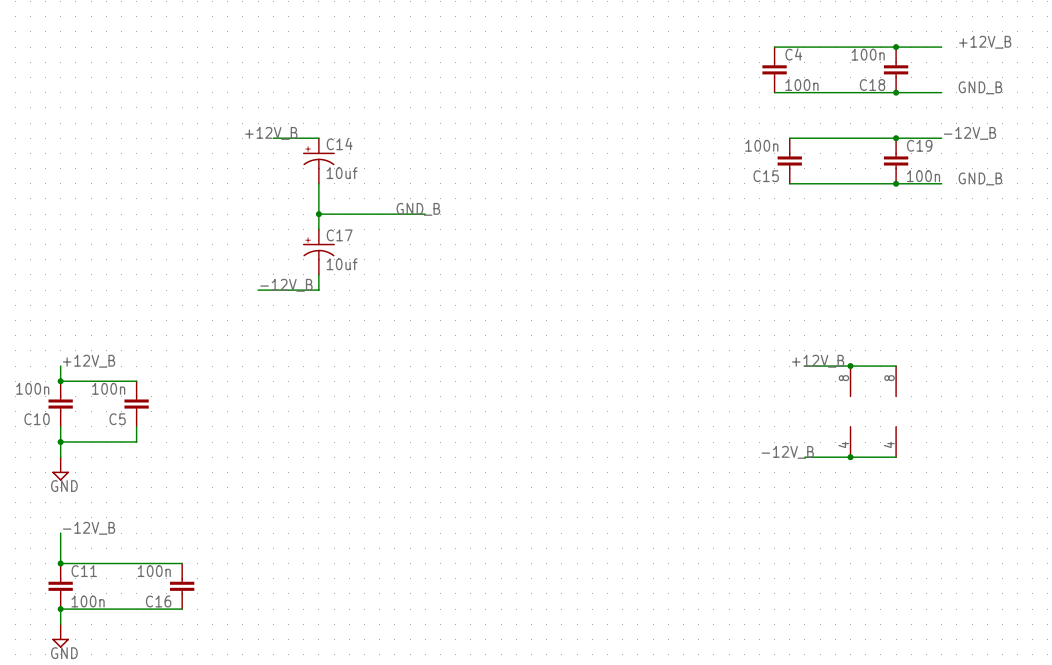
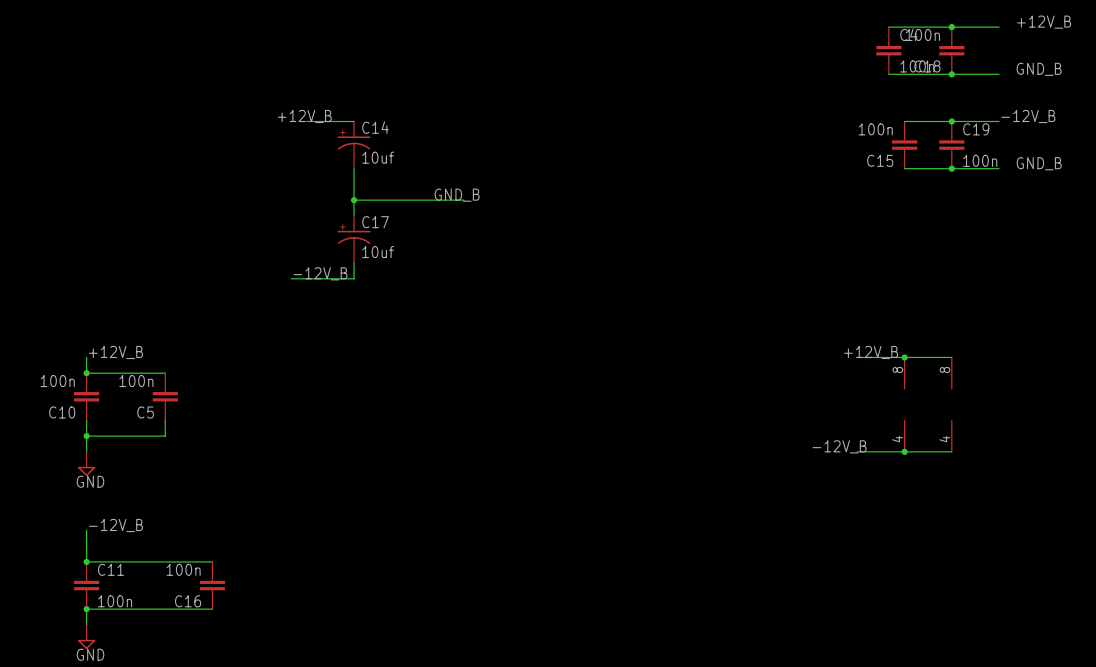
wire: (774, 47) (835, 47) -> none
C4 position: (774, 69) -> (888, 50)
wire: (774, 92) (835, 92) -> none
wire: (789, 138) (850, 138) -> none
C15 position: (789, 160) -> (904, 145)
wire: (789, 183) (850, 183) -> none

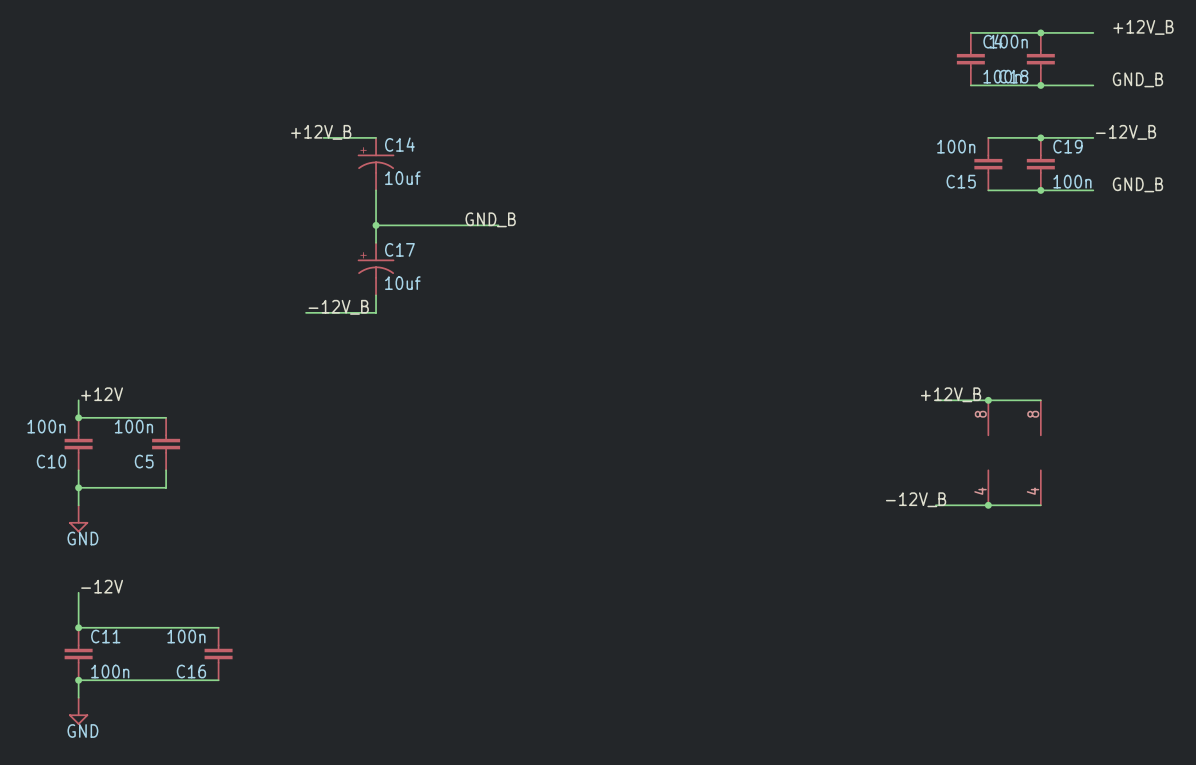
label: +12V_B (115, 352) -> +12V (102, 394)
label: -12V_B (115, 525) -> -12V (102, 586)

